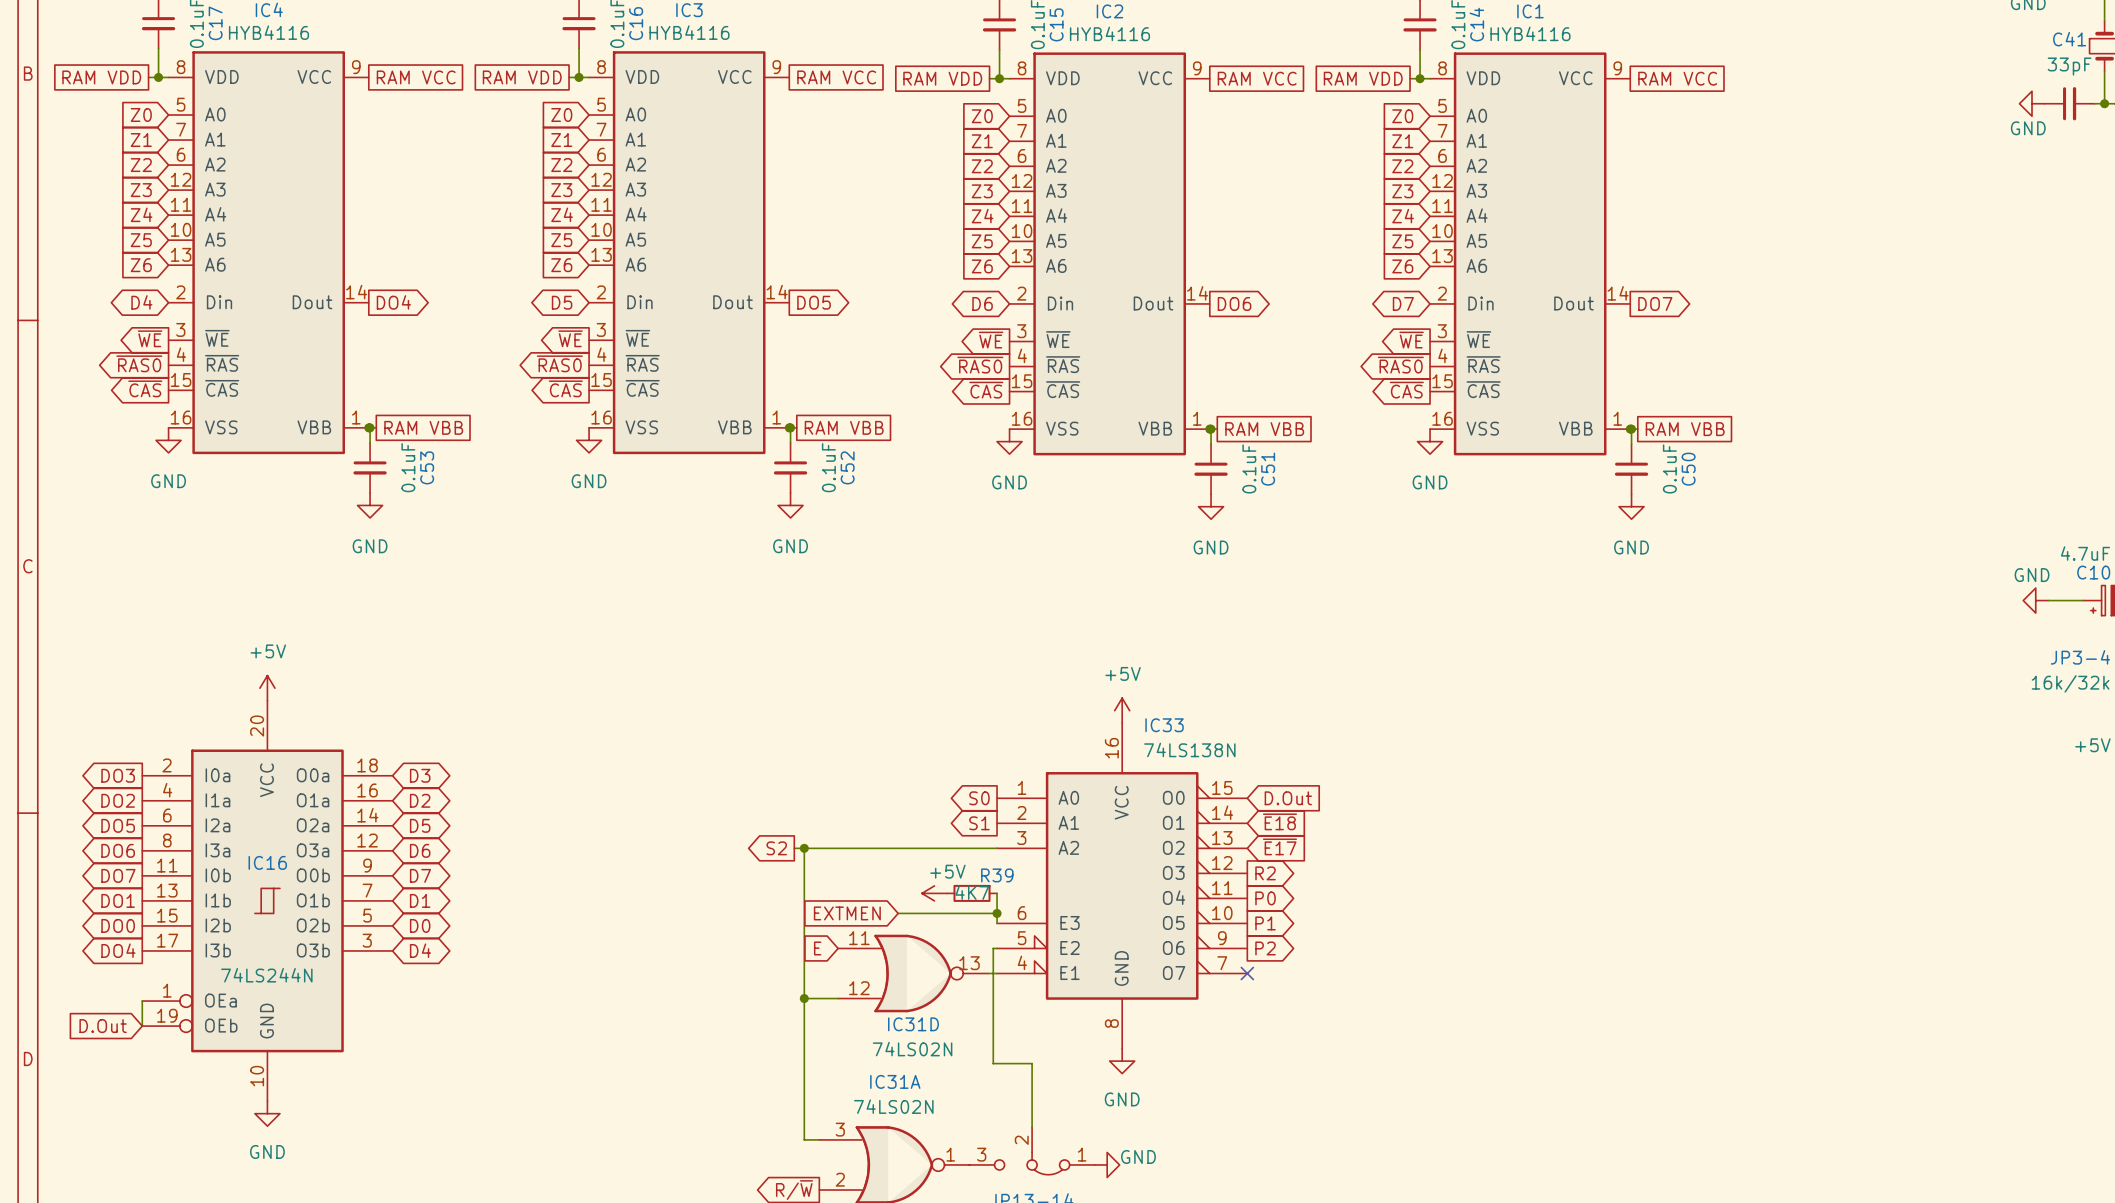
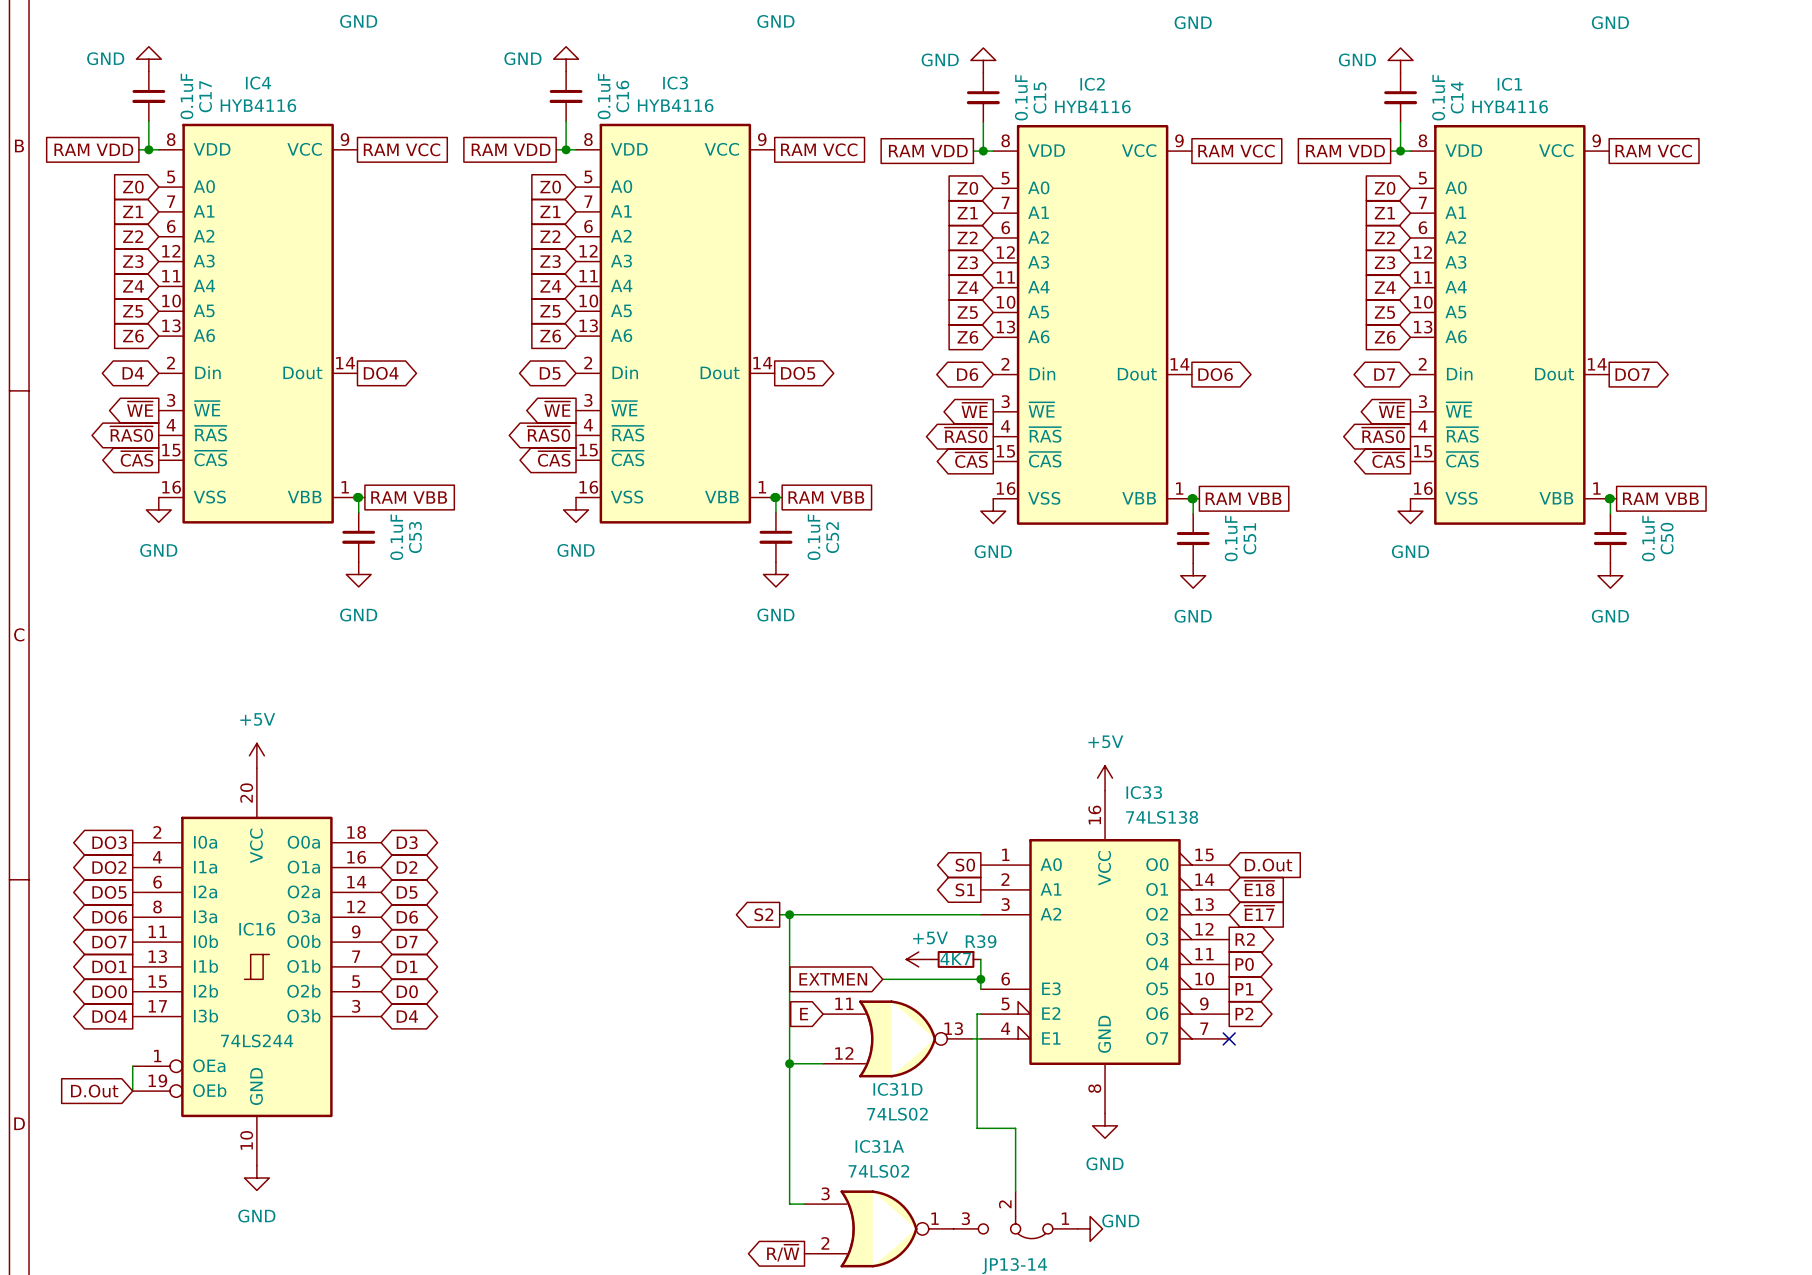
IC33 value: 74LS138N (1189, 749) -> 74LS138 (1162, 817)
IC16 value: 74LS244N (266, 975) -> 74LS244 (257, 1040)
IC31D value: 74LS02N (912, 1049) -> 74LS02 (897, 1114)
IC31A value: 74LS02N (893, 1106) -> 74LS02 (878, 1171)

